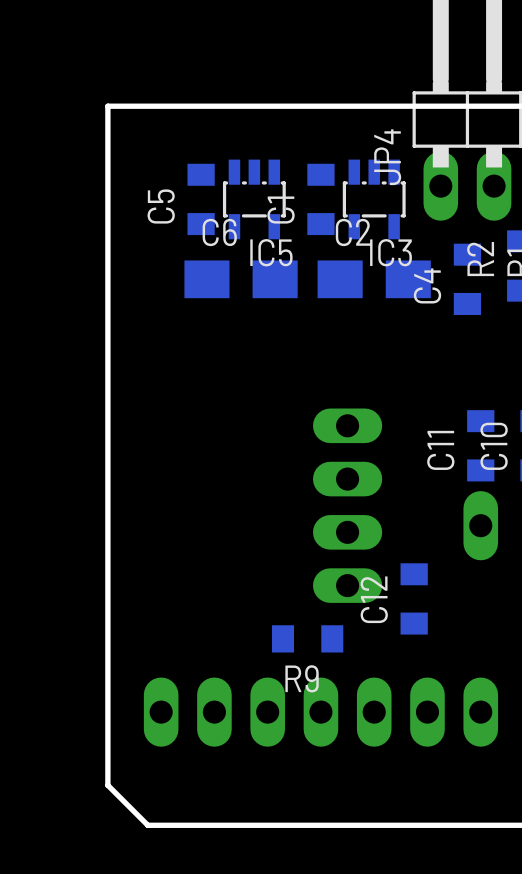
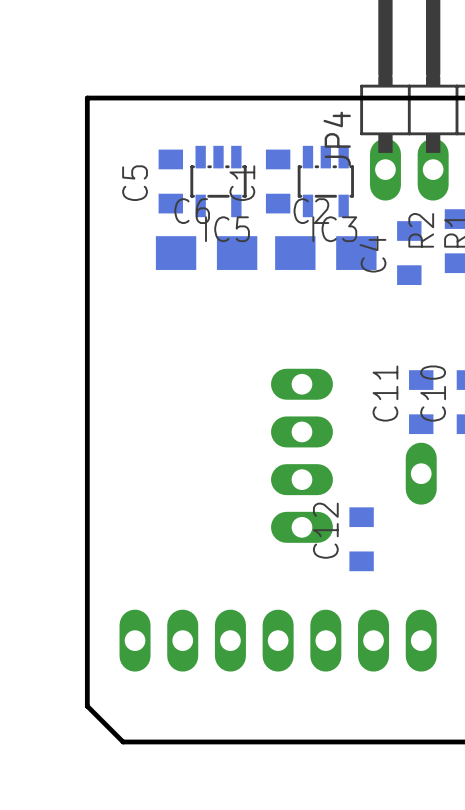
R9: (307, 638) -> none

